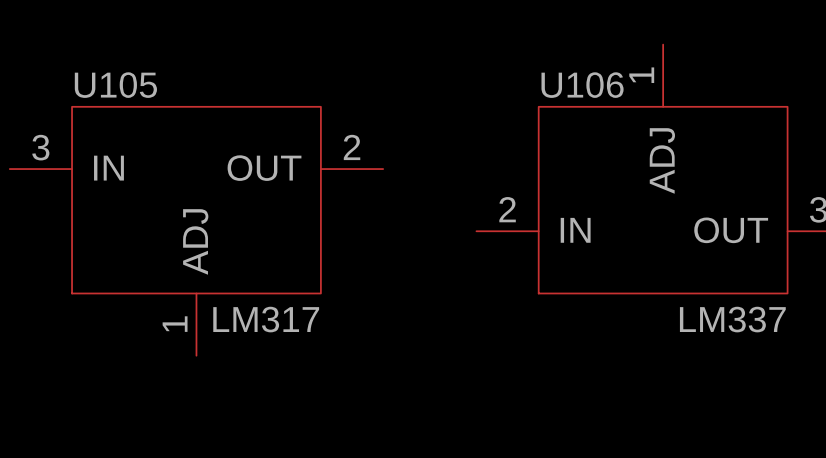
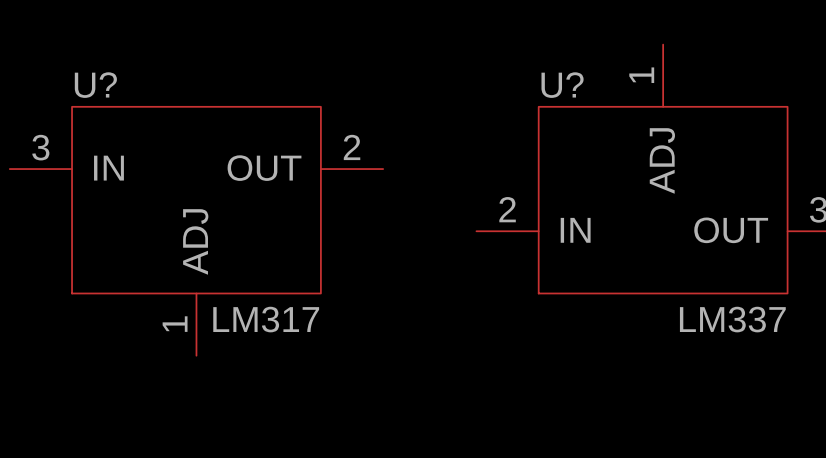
U105 name: U105 (115, 85) -> U? (95, 85)
U106 name: U106 (582, 85) -> U? (562, 85)

